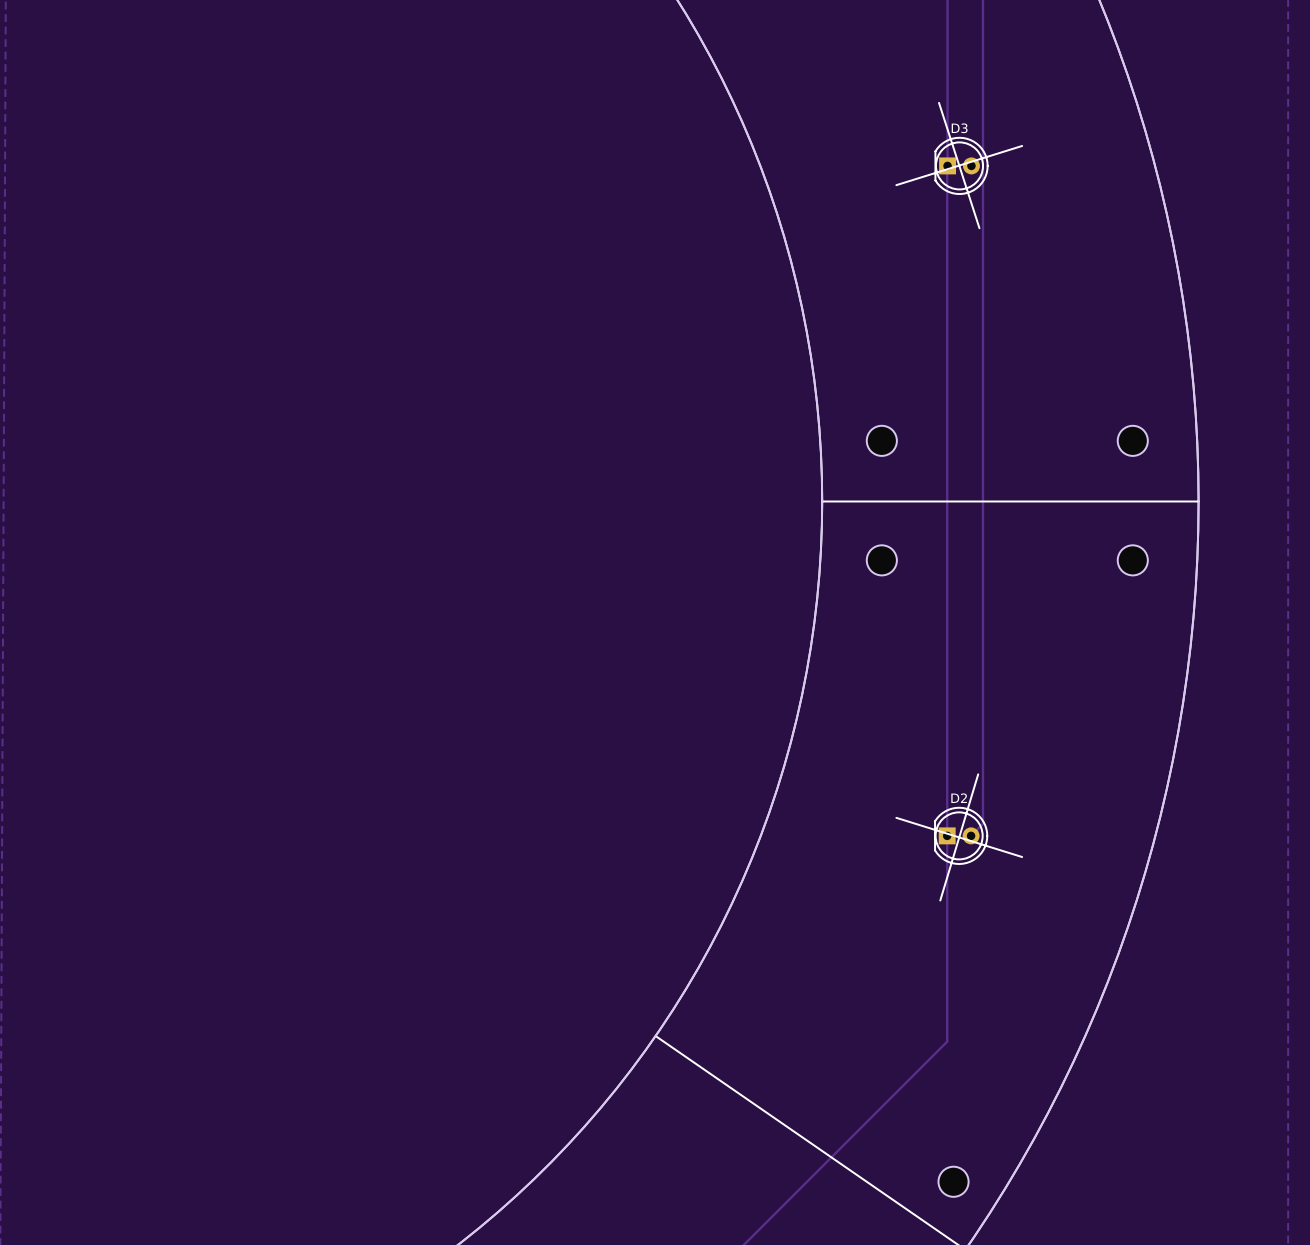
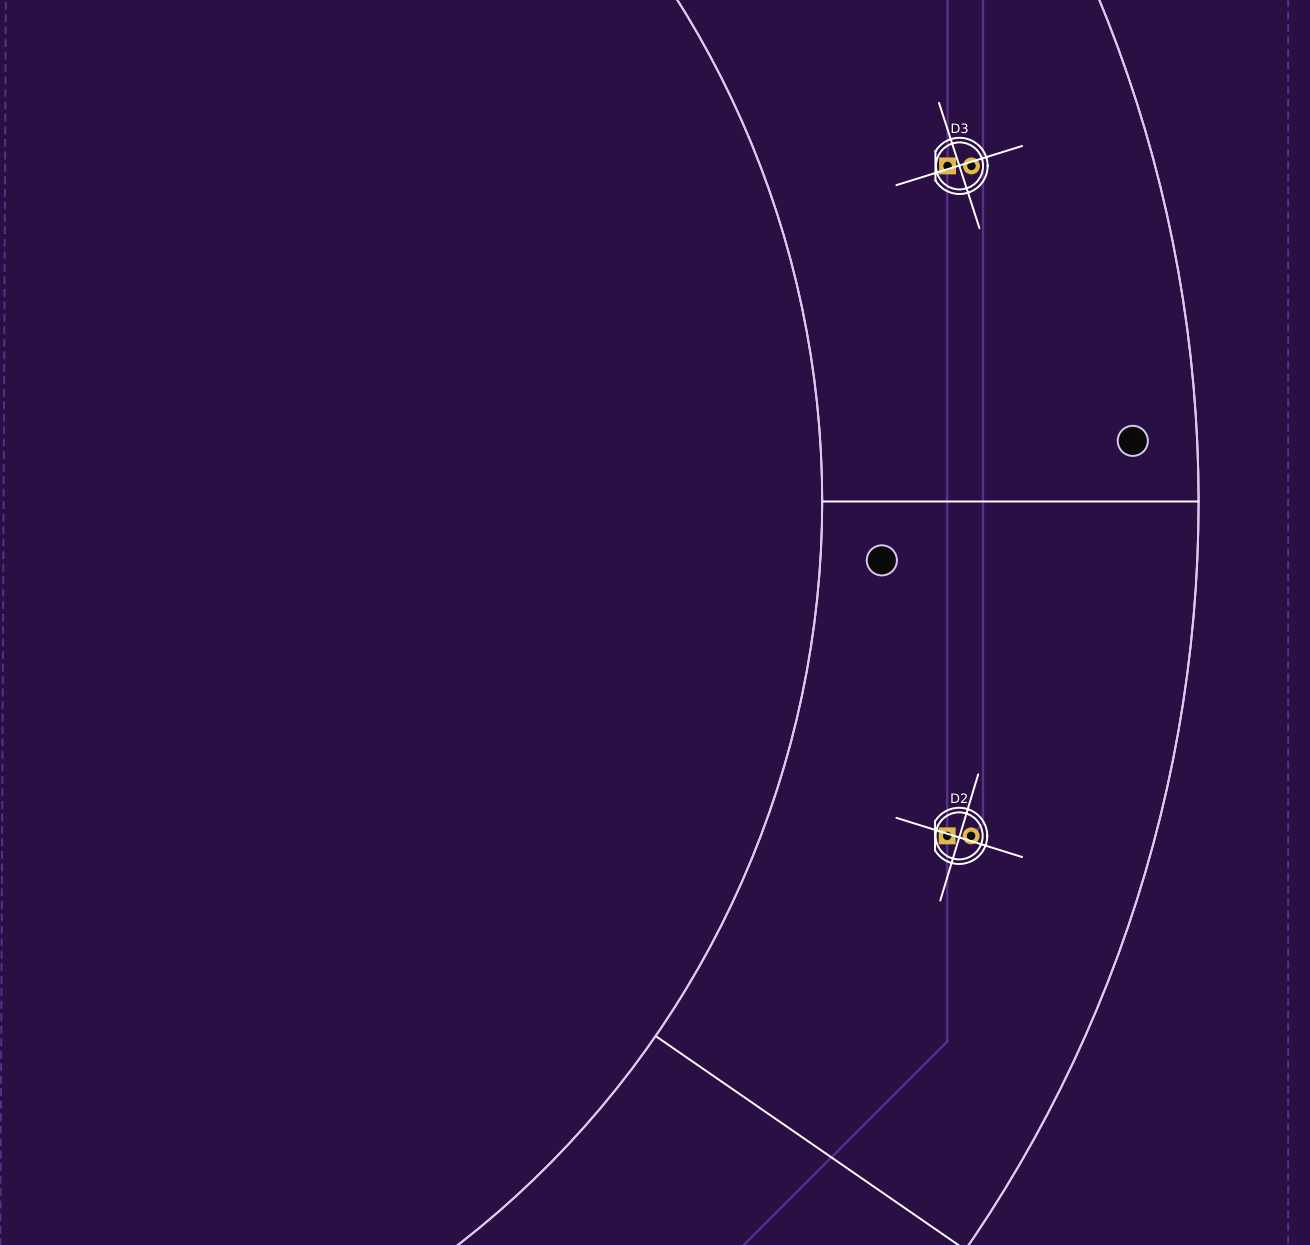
part: (881, 440) -> none
part: (1132, 560) -> none
part: (953, 1181) -> none

